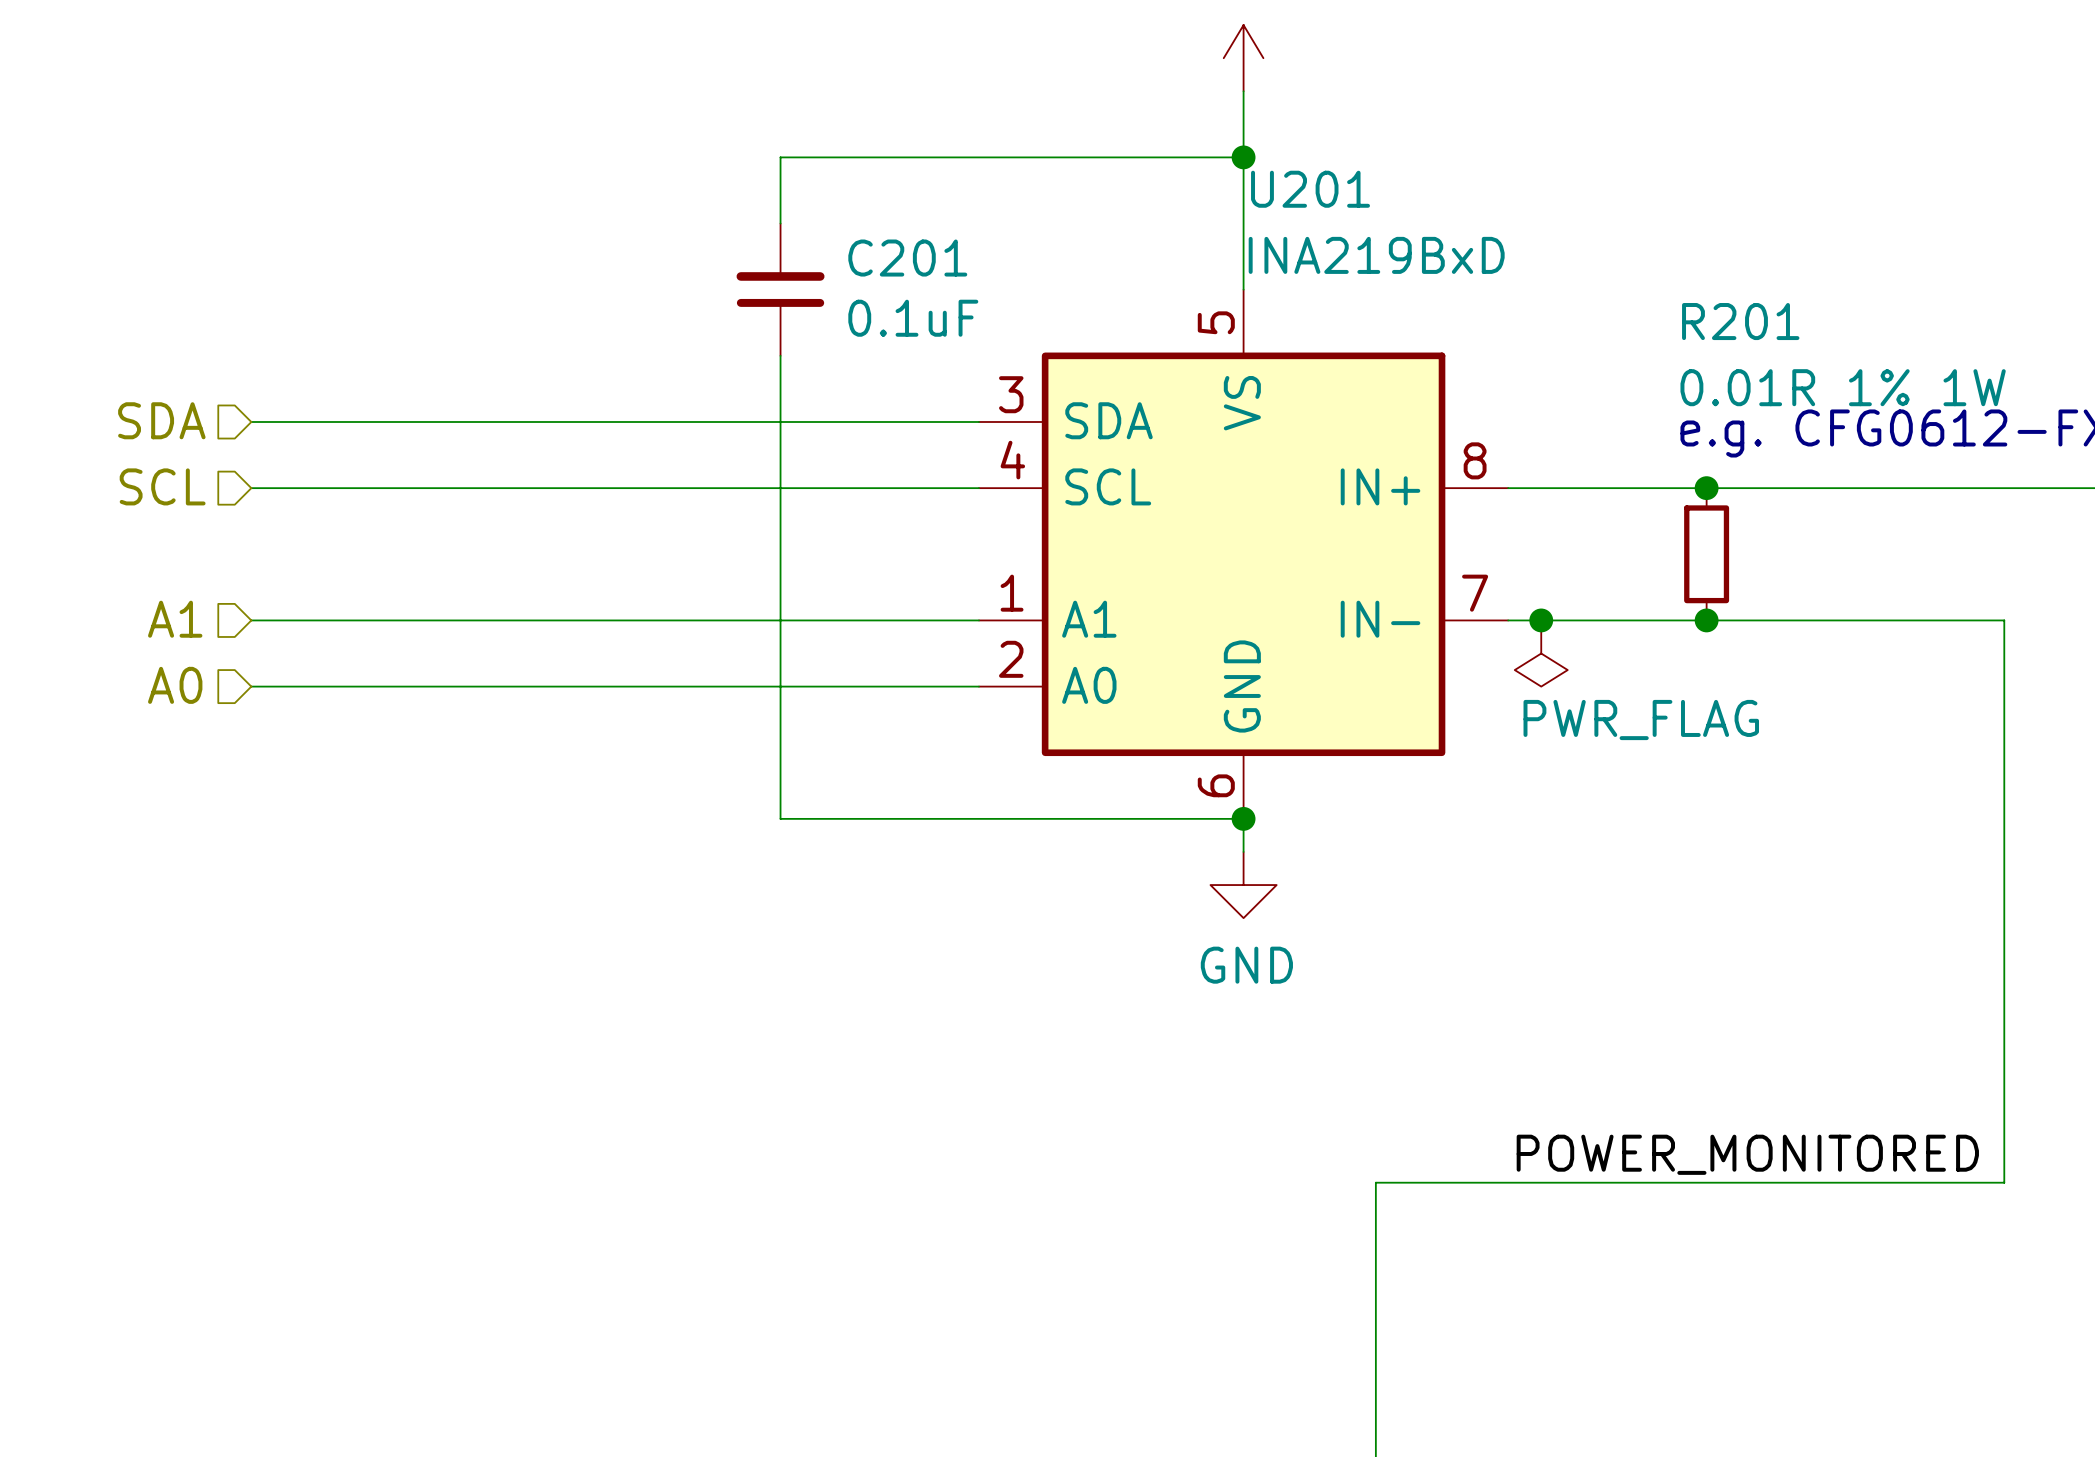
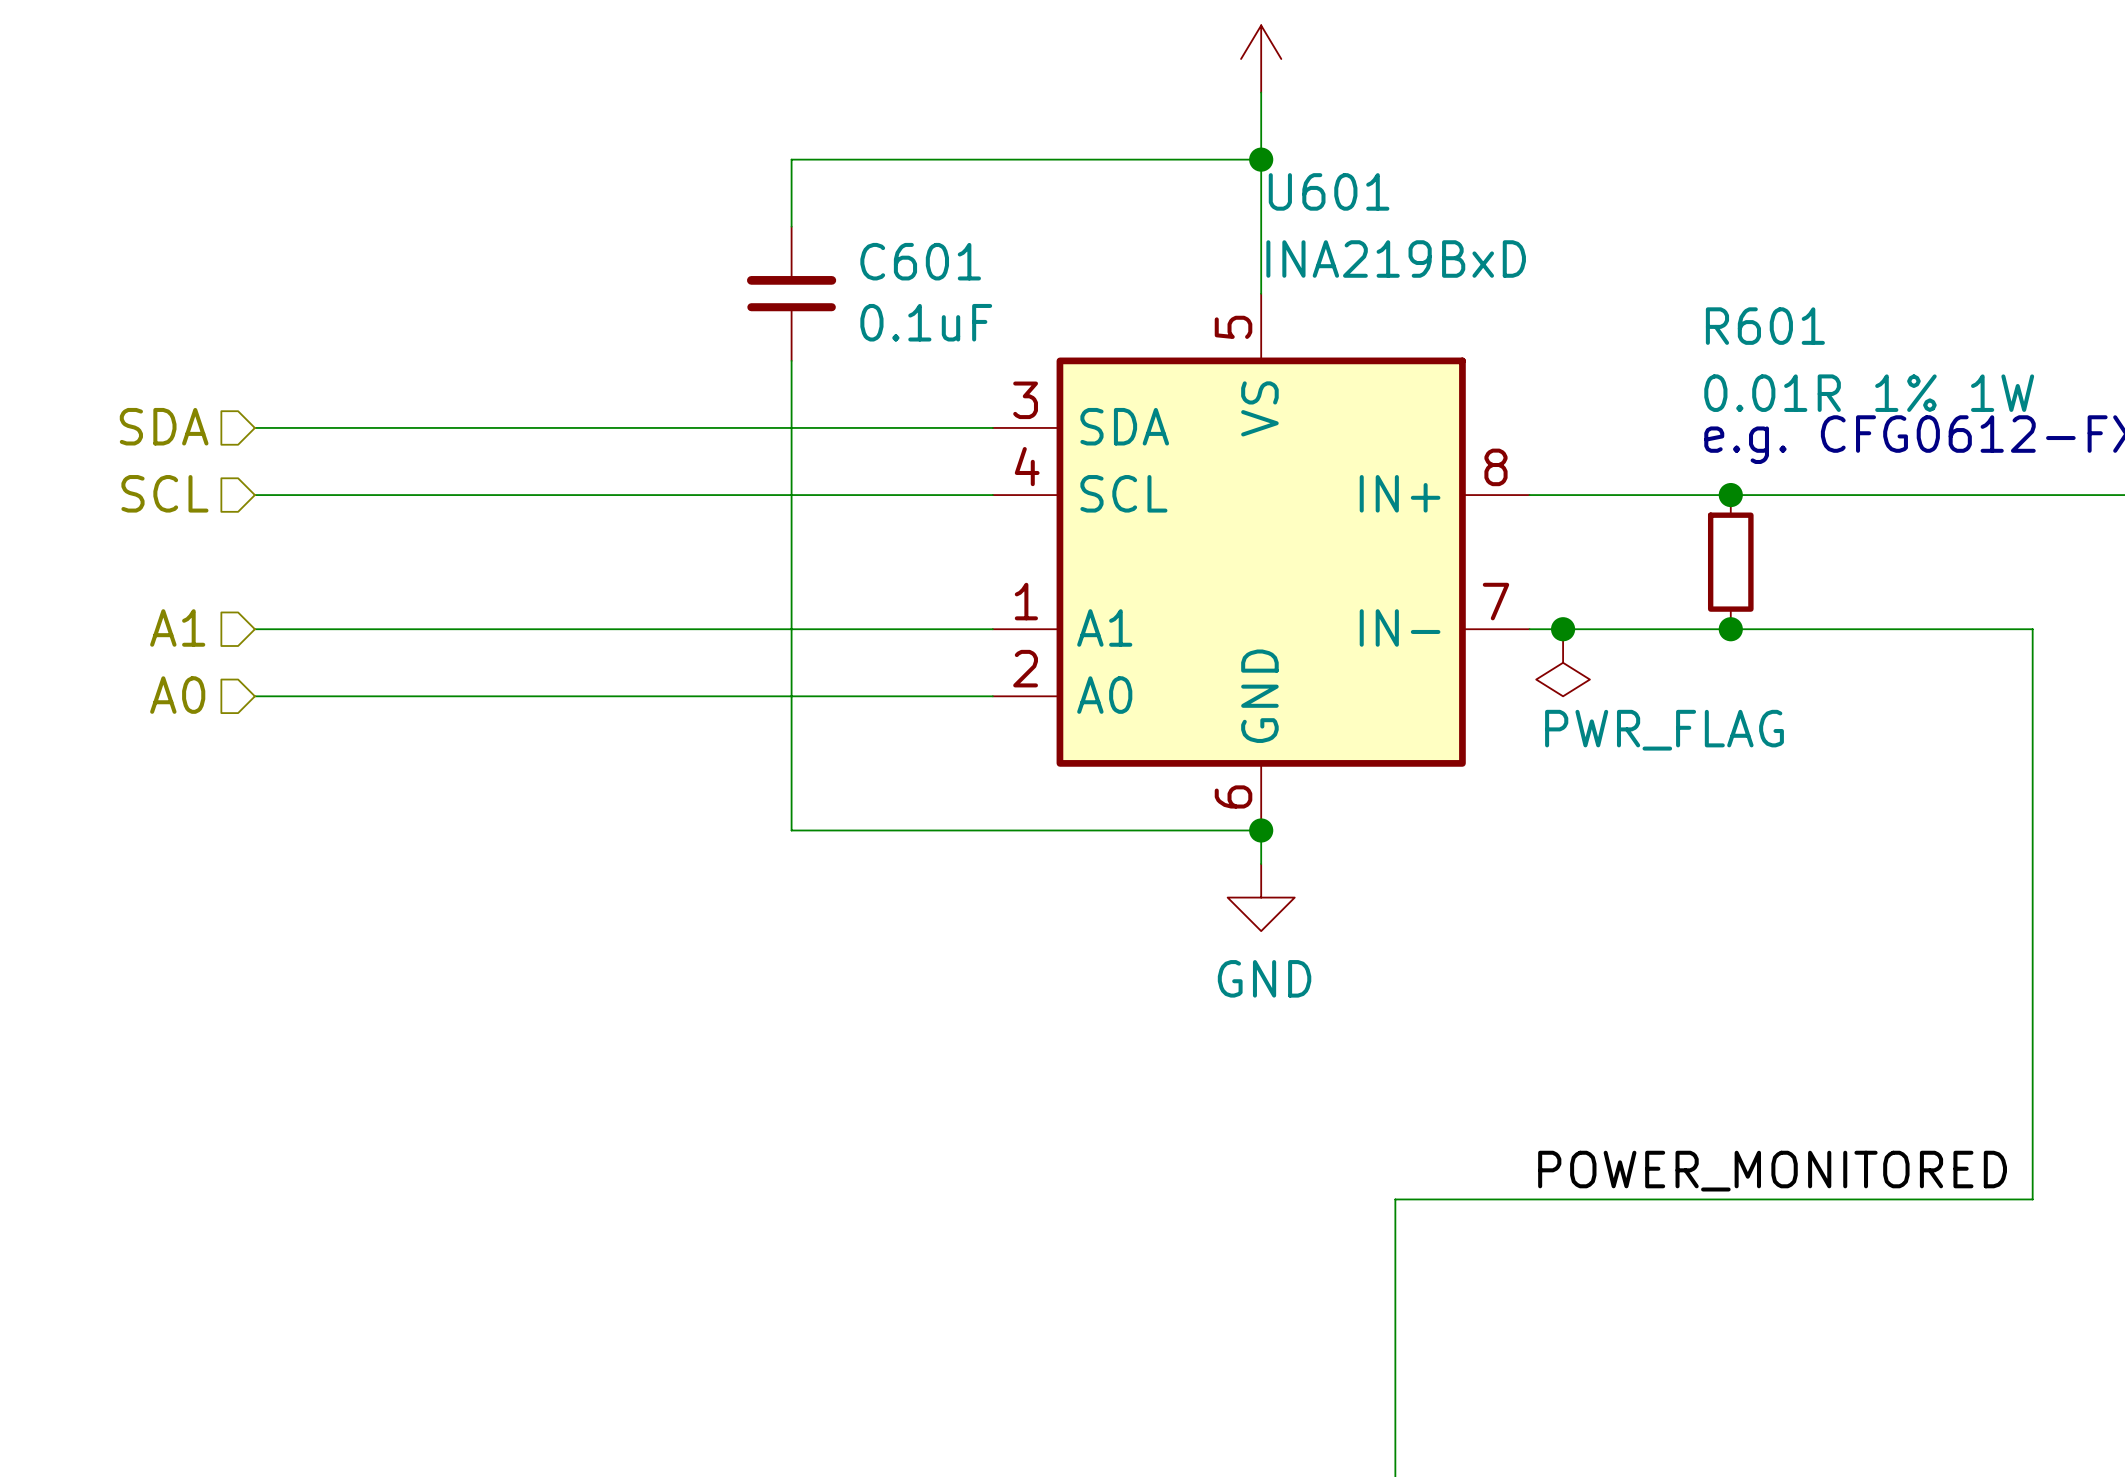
U201 name: U201 (1310, 189) -> U601 (1329, 191)
C201 name: C201 (907, 258) -> C601 (920, 261)
R201 name: R201 (1740, 321) -> R601 (1765, 326)

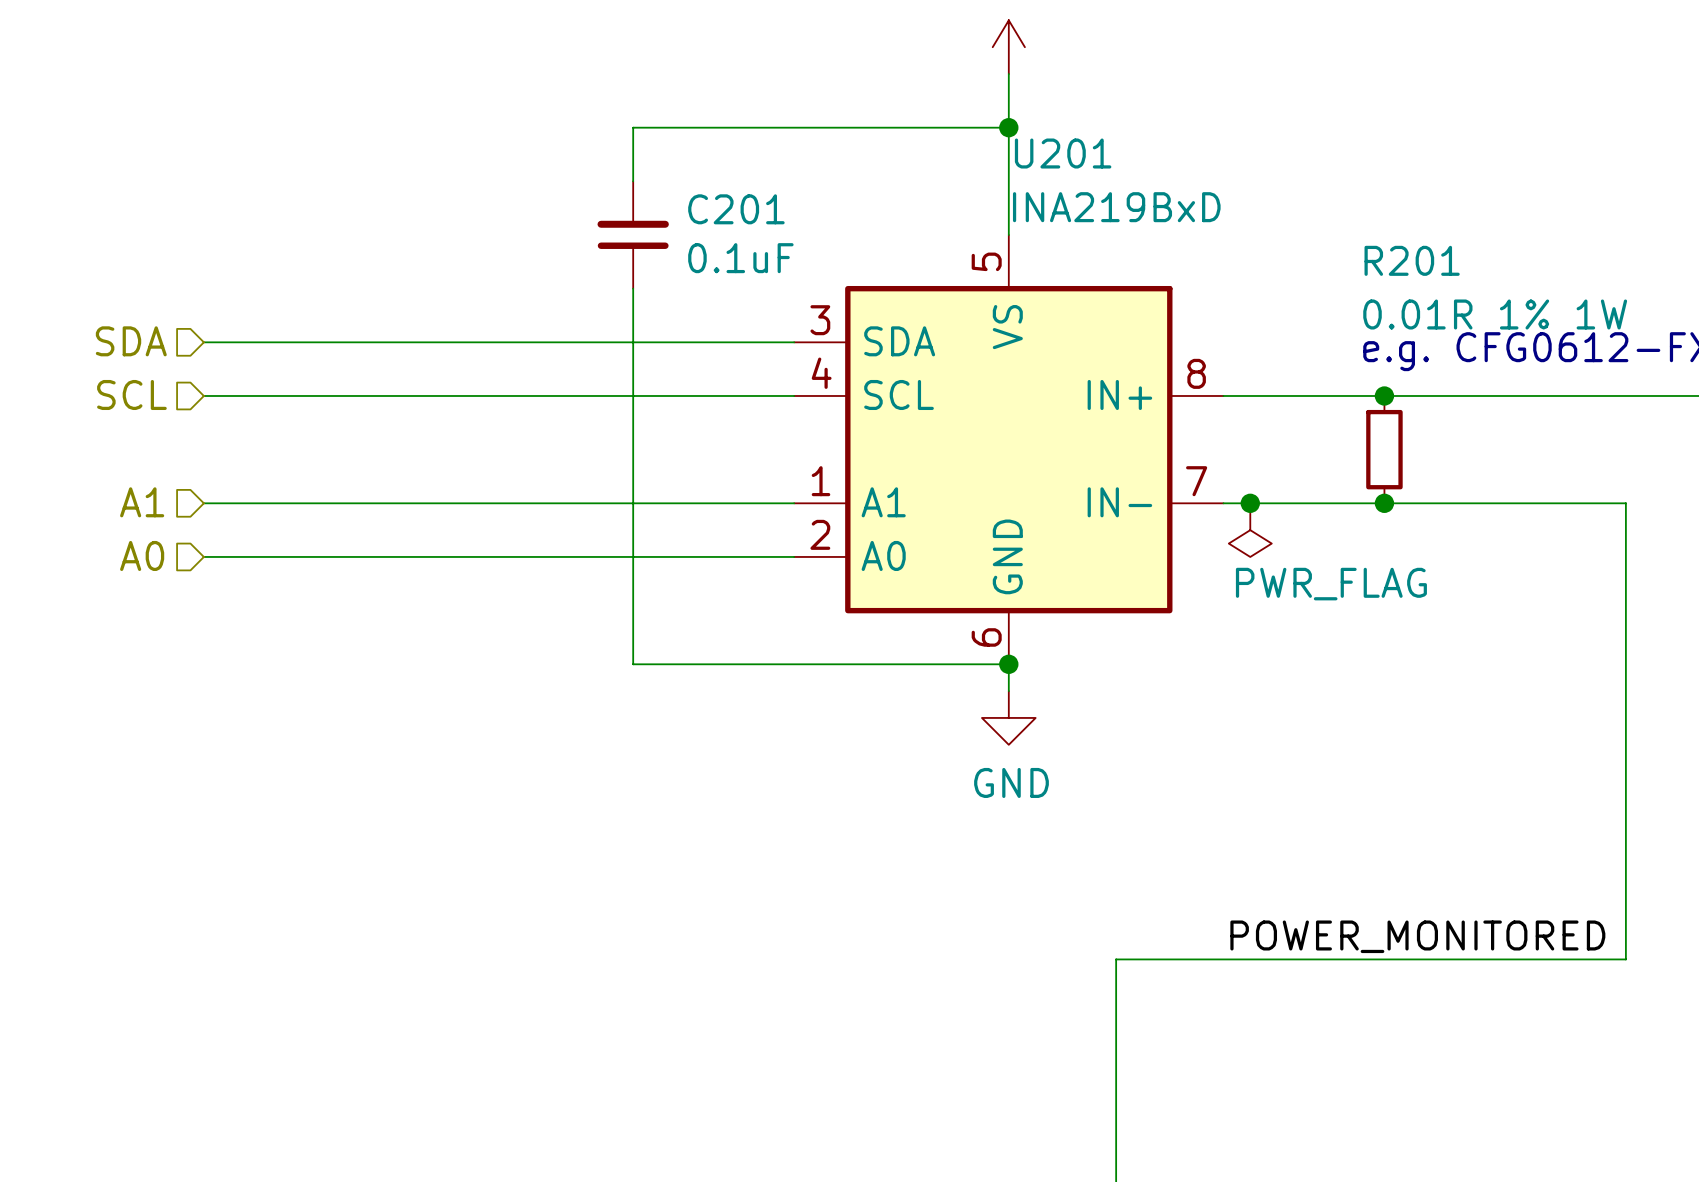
U601 name: U601 (1329, 191) -> U201 (1063, 153)
C601 name: C601 (920, 261) -> C201 (736, 209)
R601 name: R601 (1765, 326) -> R201 (1412, 260)

